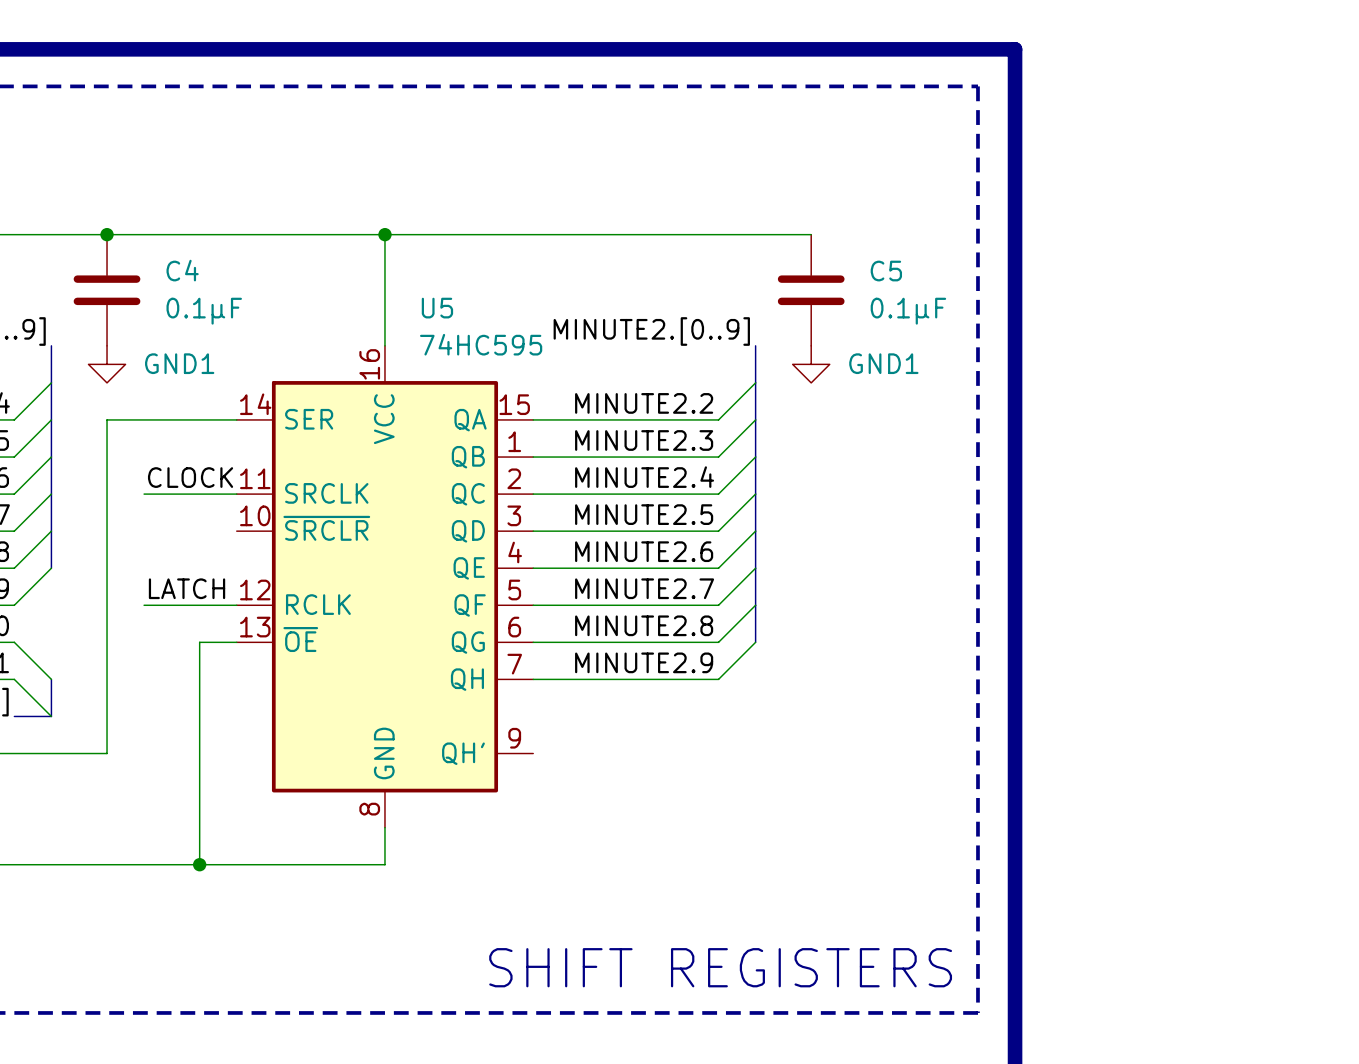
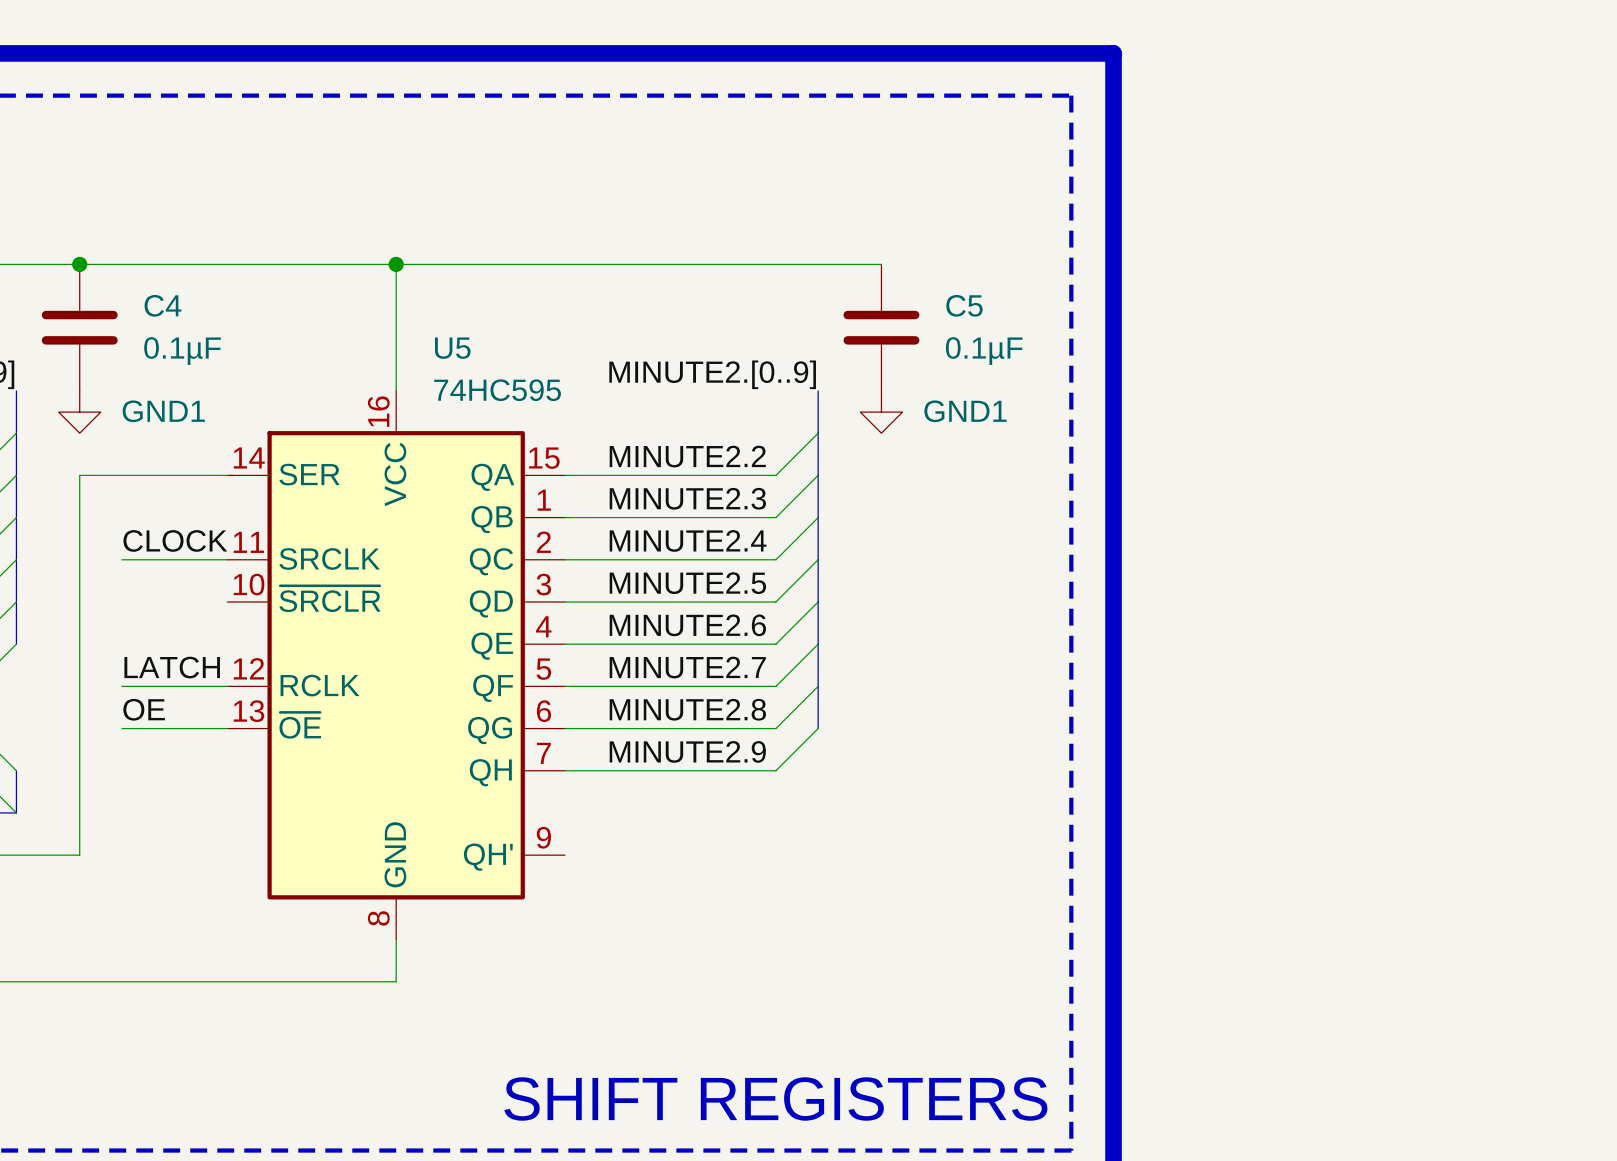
label: none -> OE (144, 709)
wire: (199, 642) (199, 864) -> (185, 728) (121, 728)
junction: (199, 864) -> none

